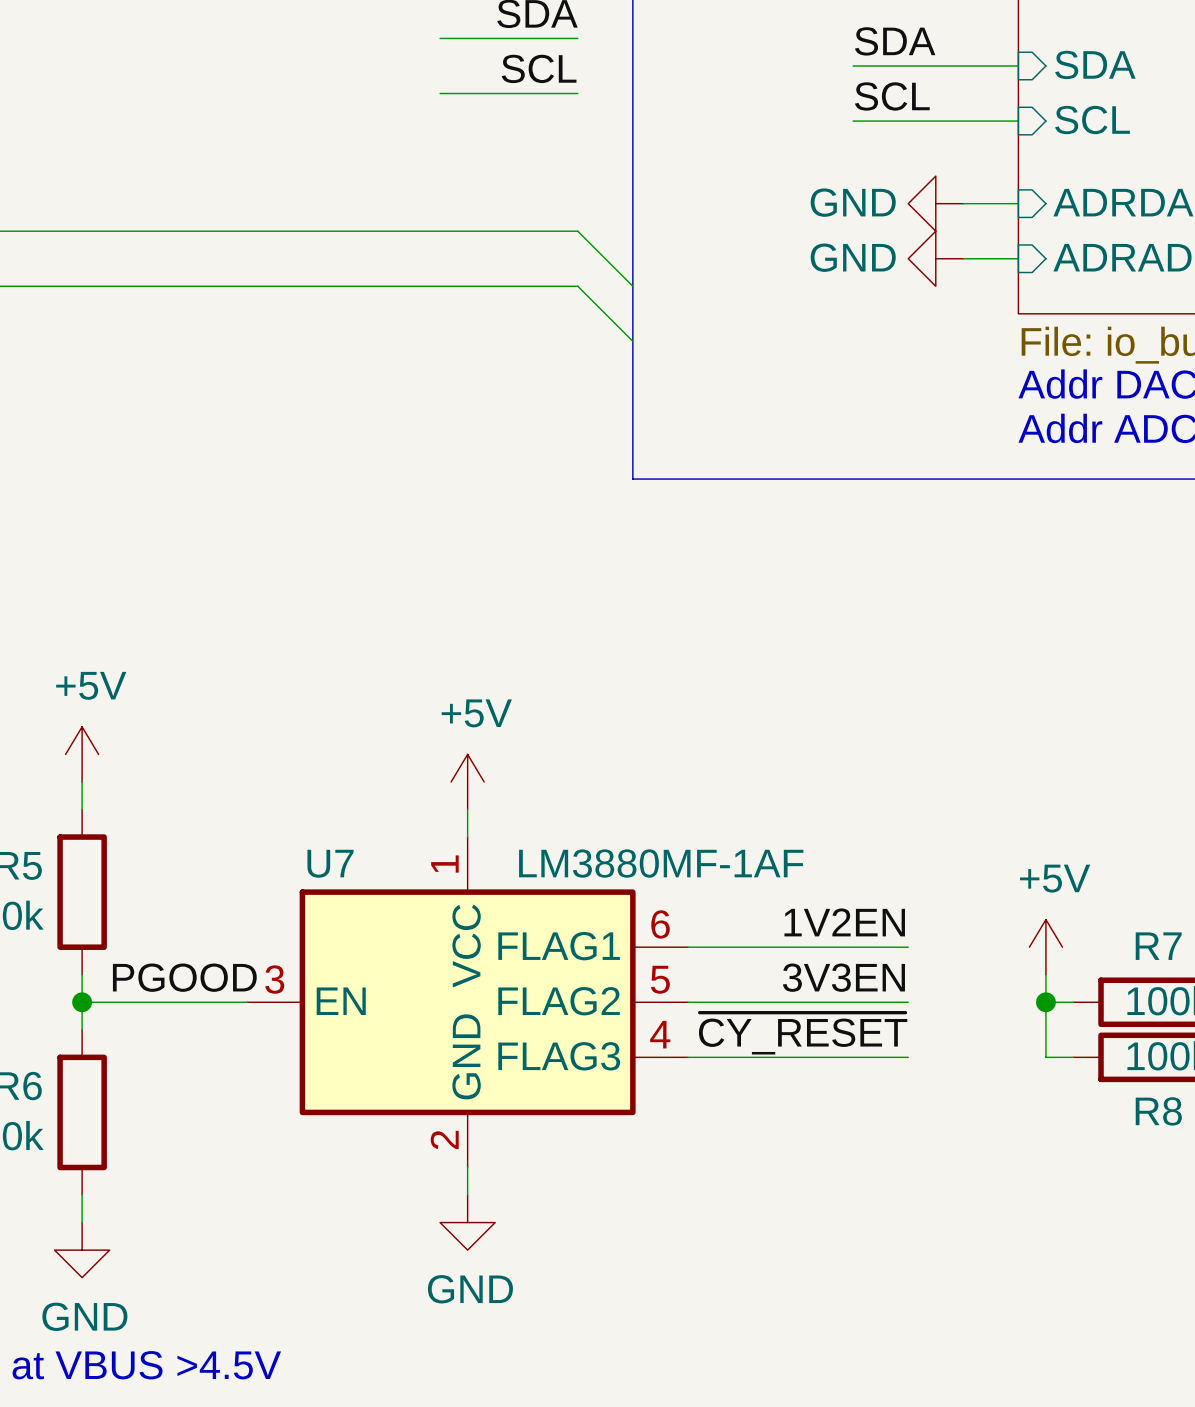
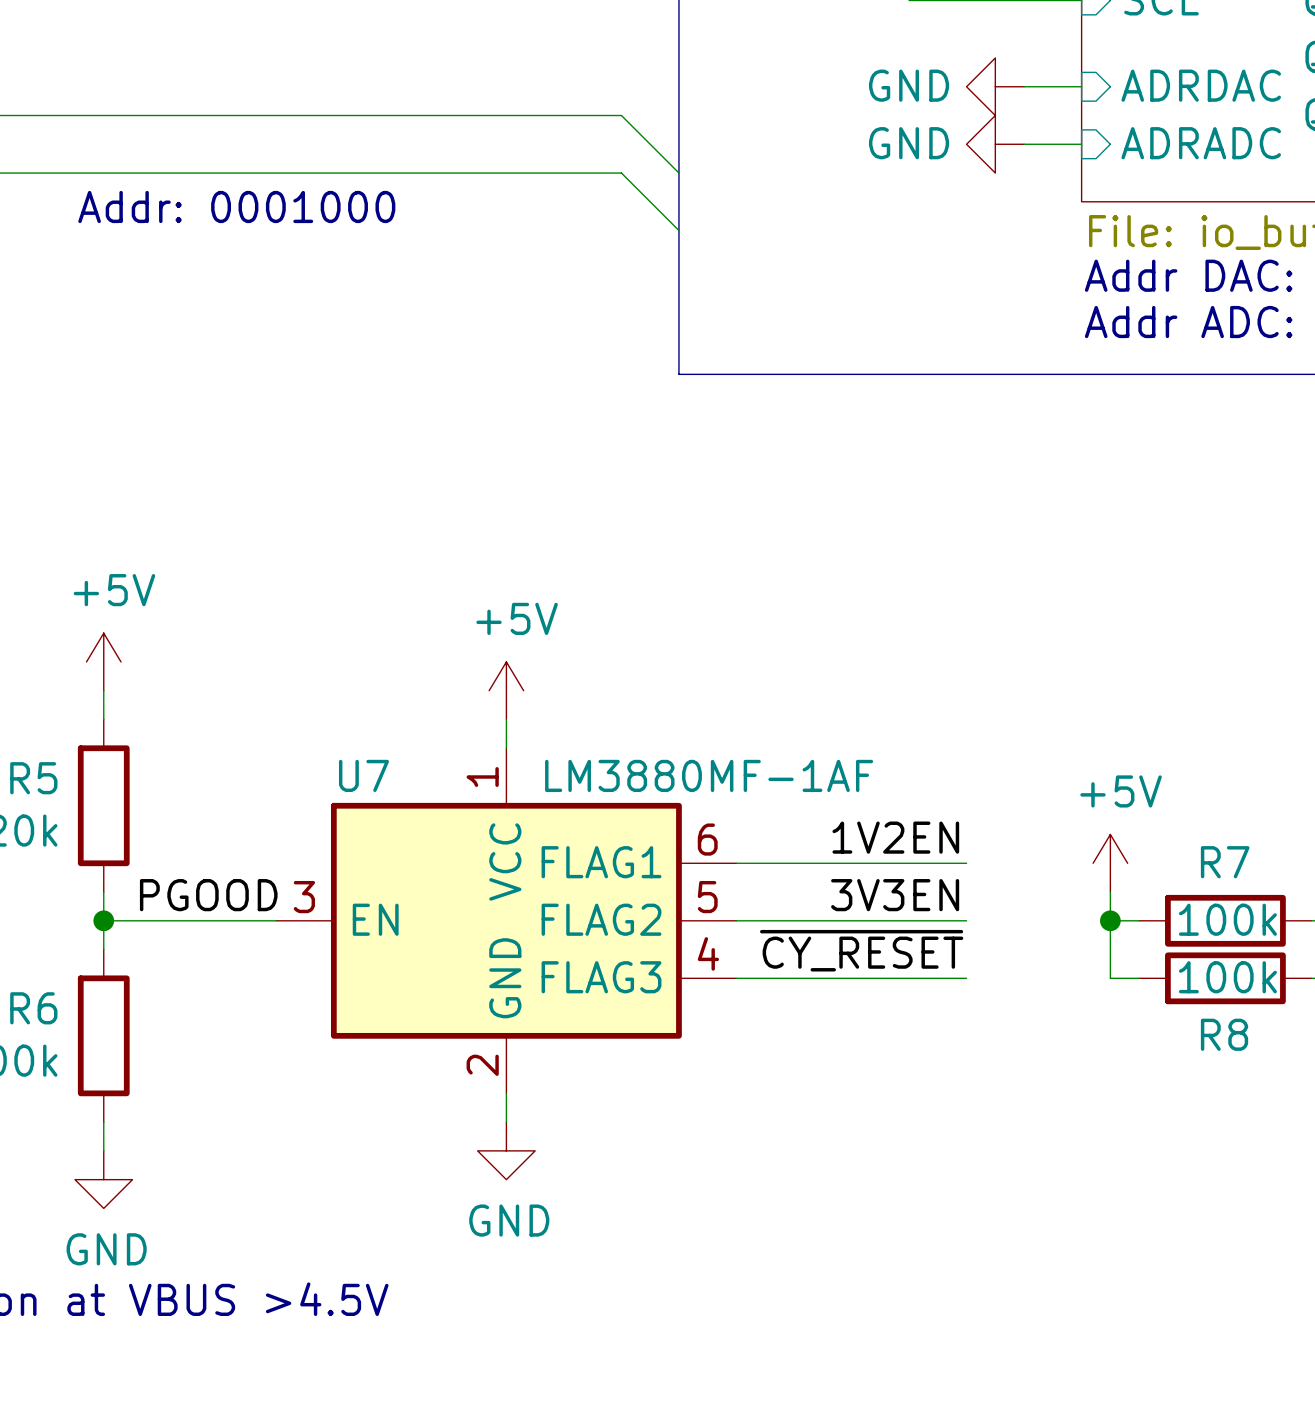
text: none -> Addr: 0001000 (236, 206)

